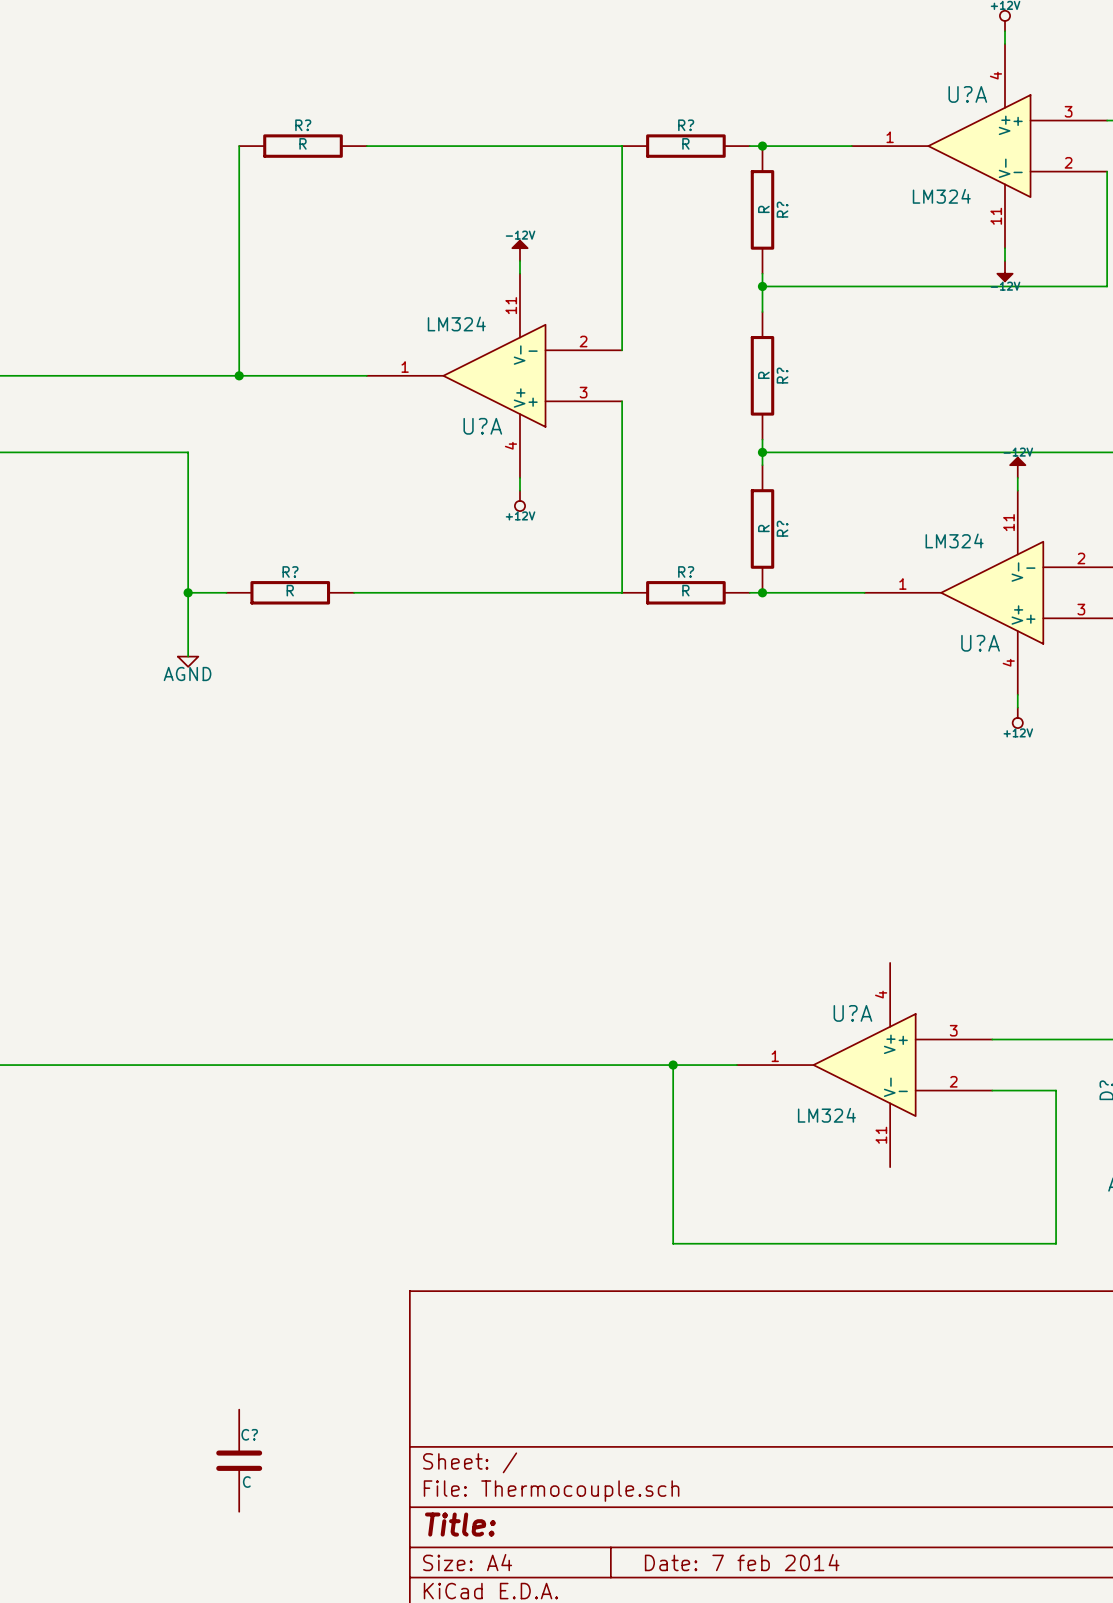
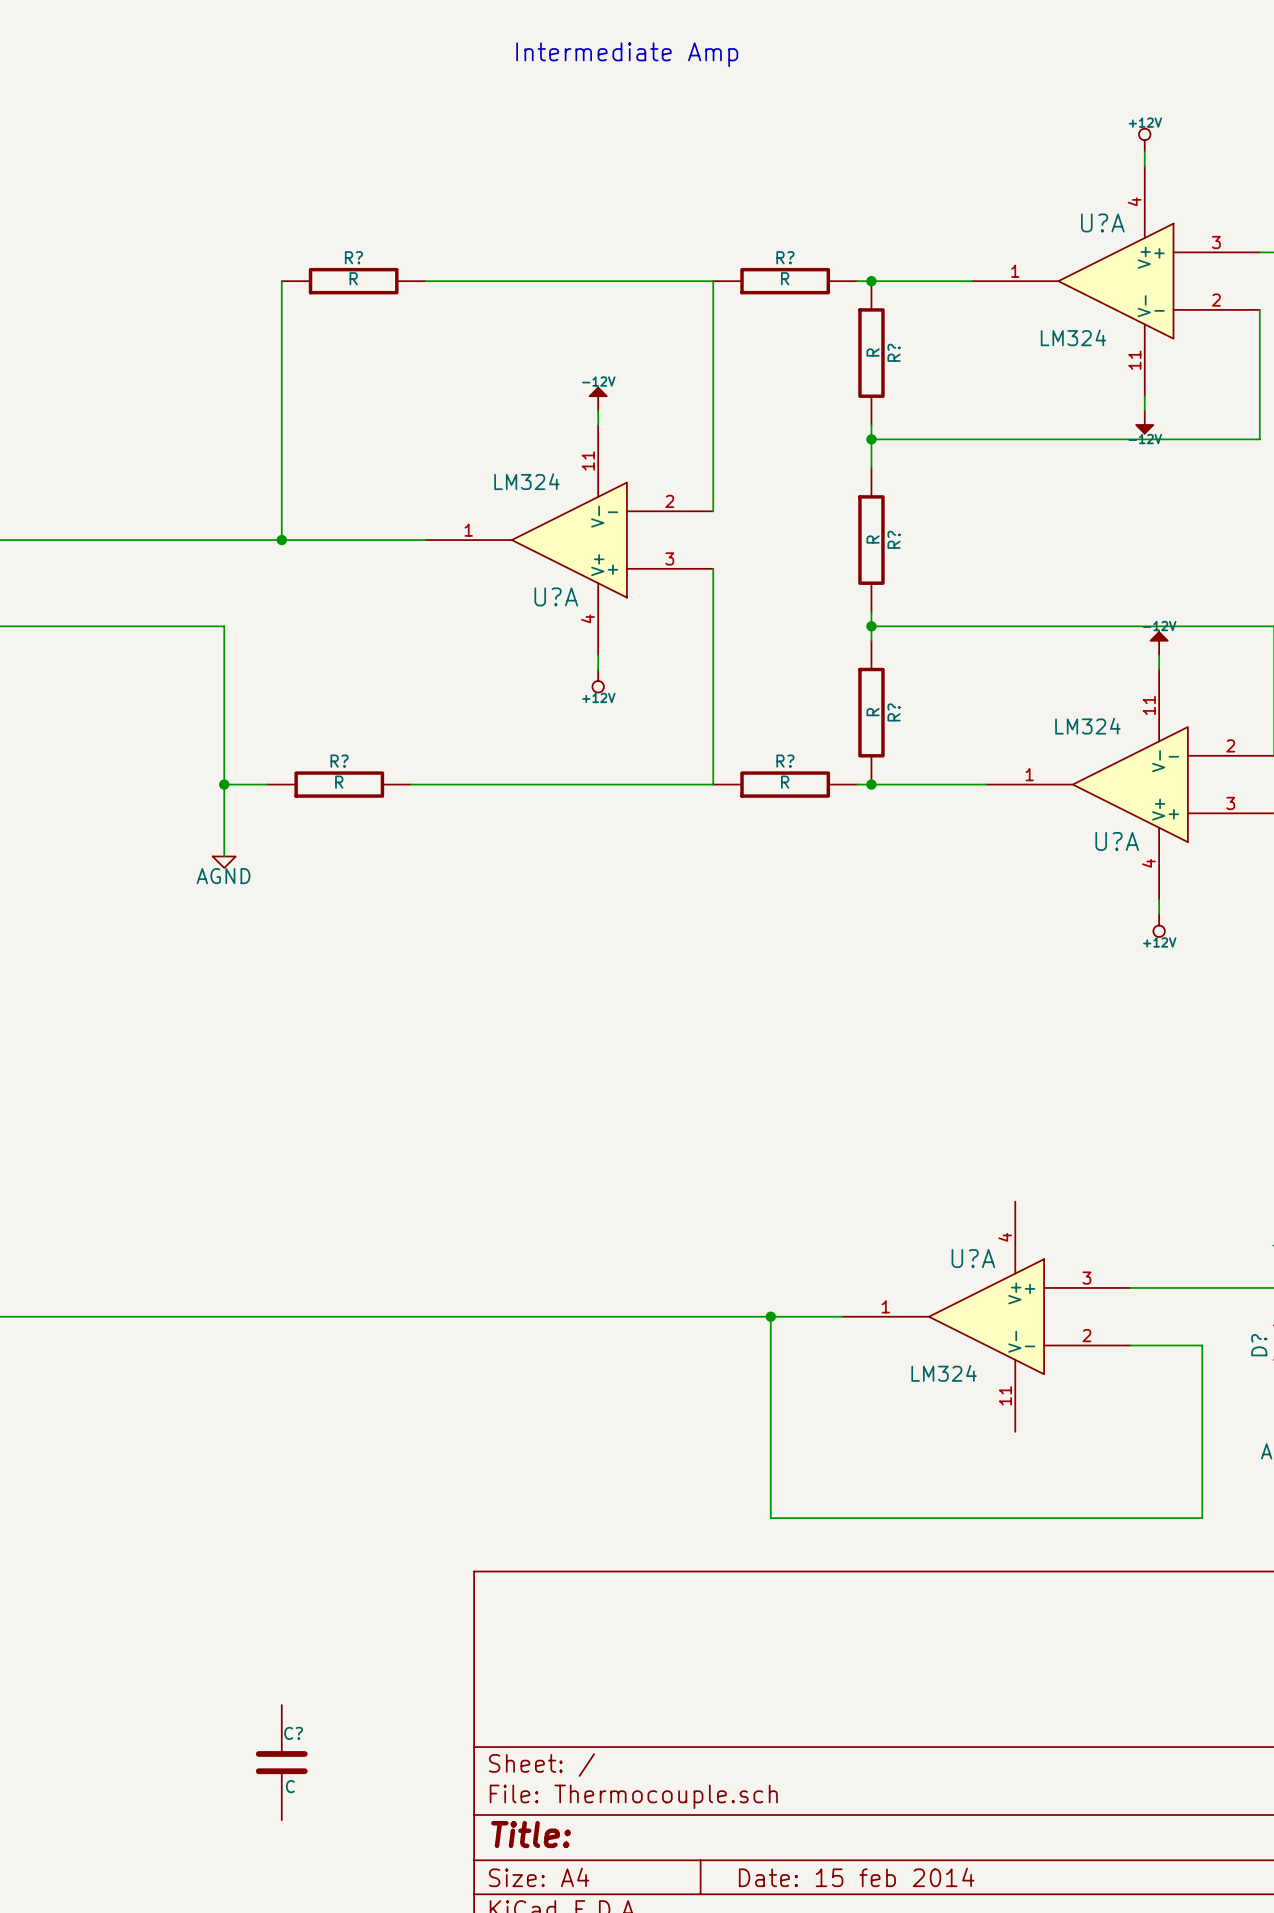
title block: Date: 7 feb 2014 (742, 1562) -> Date: 15 feb 2014 (856, 1877)

